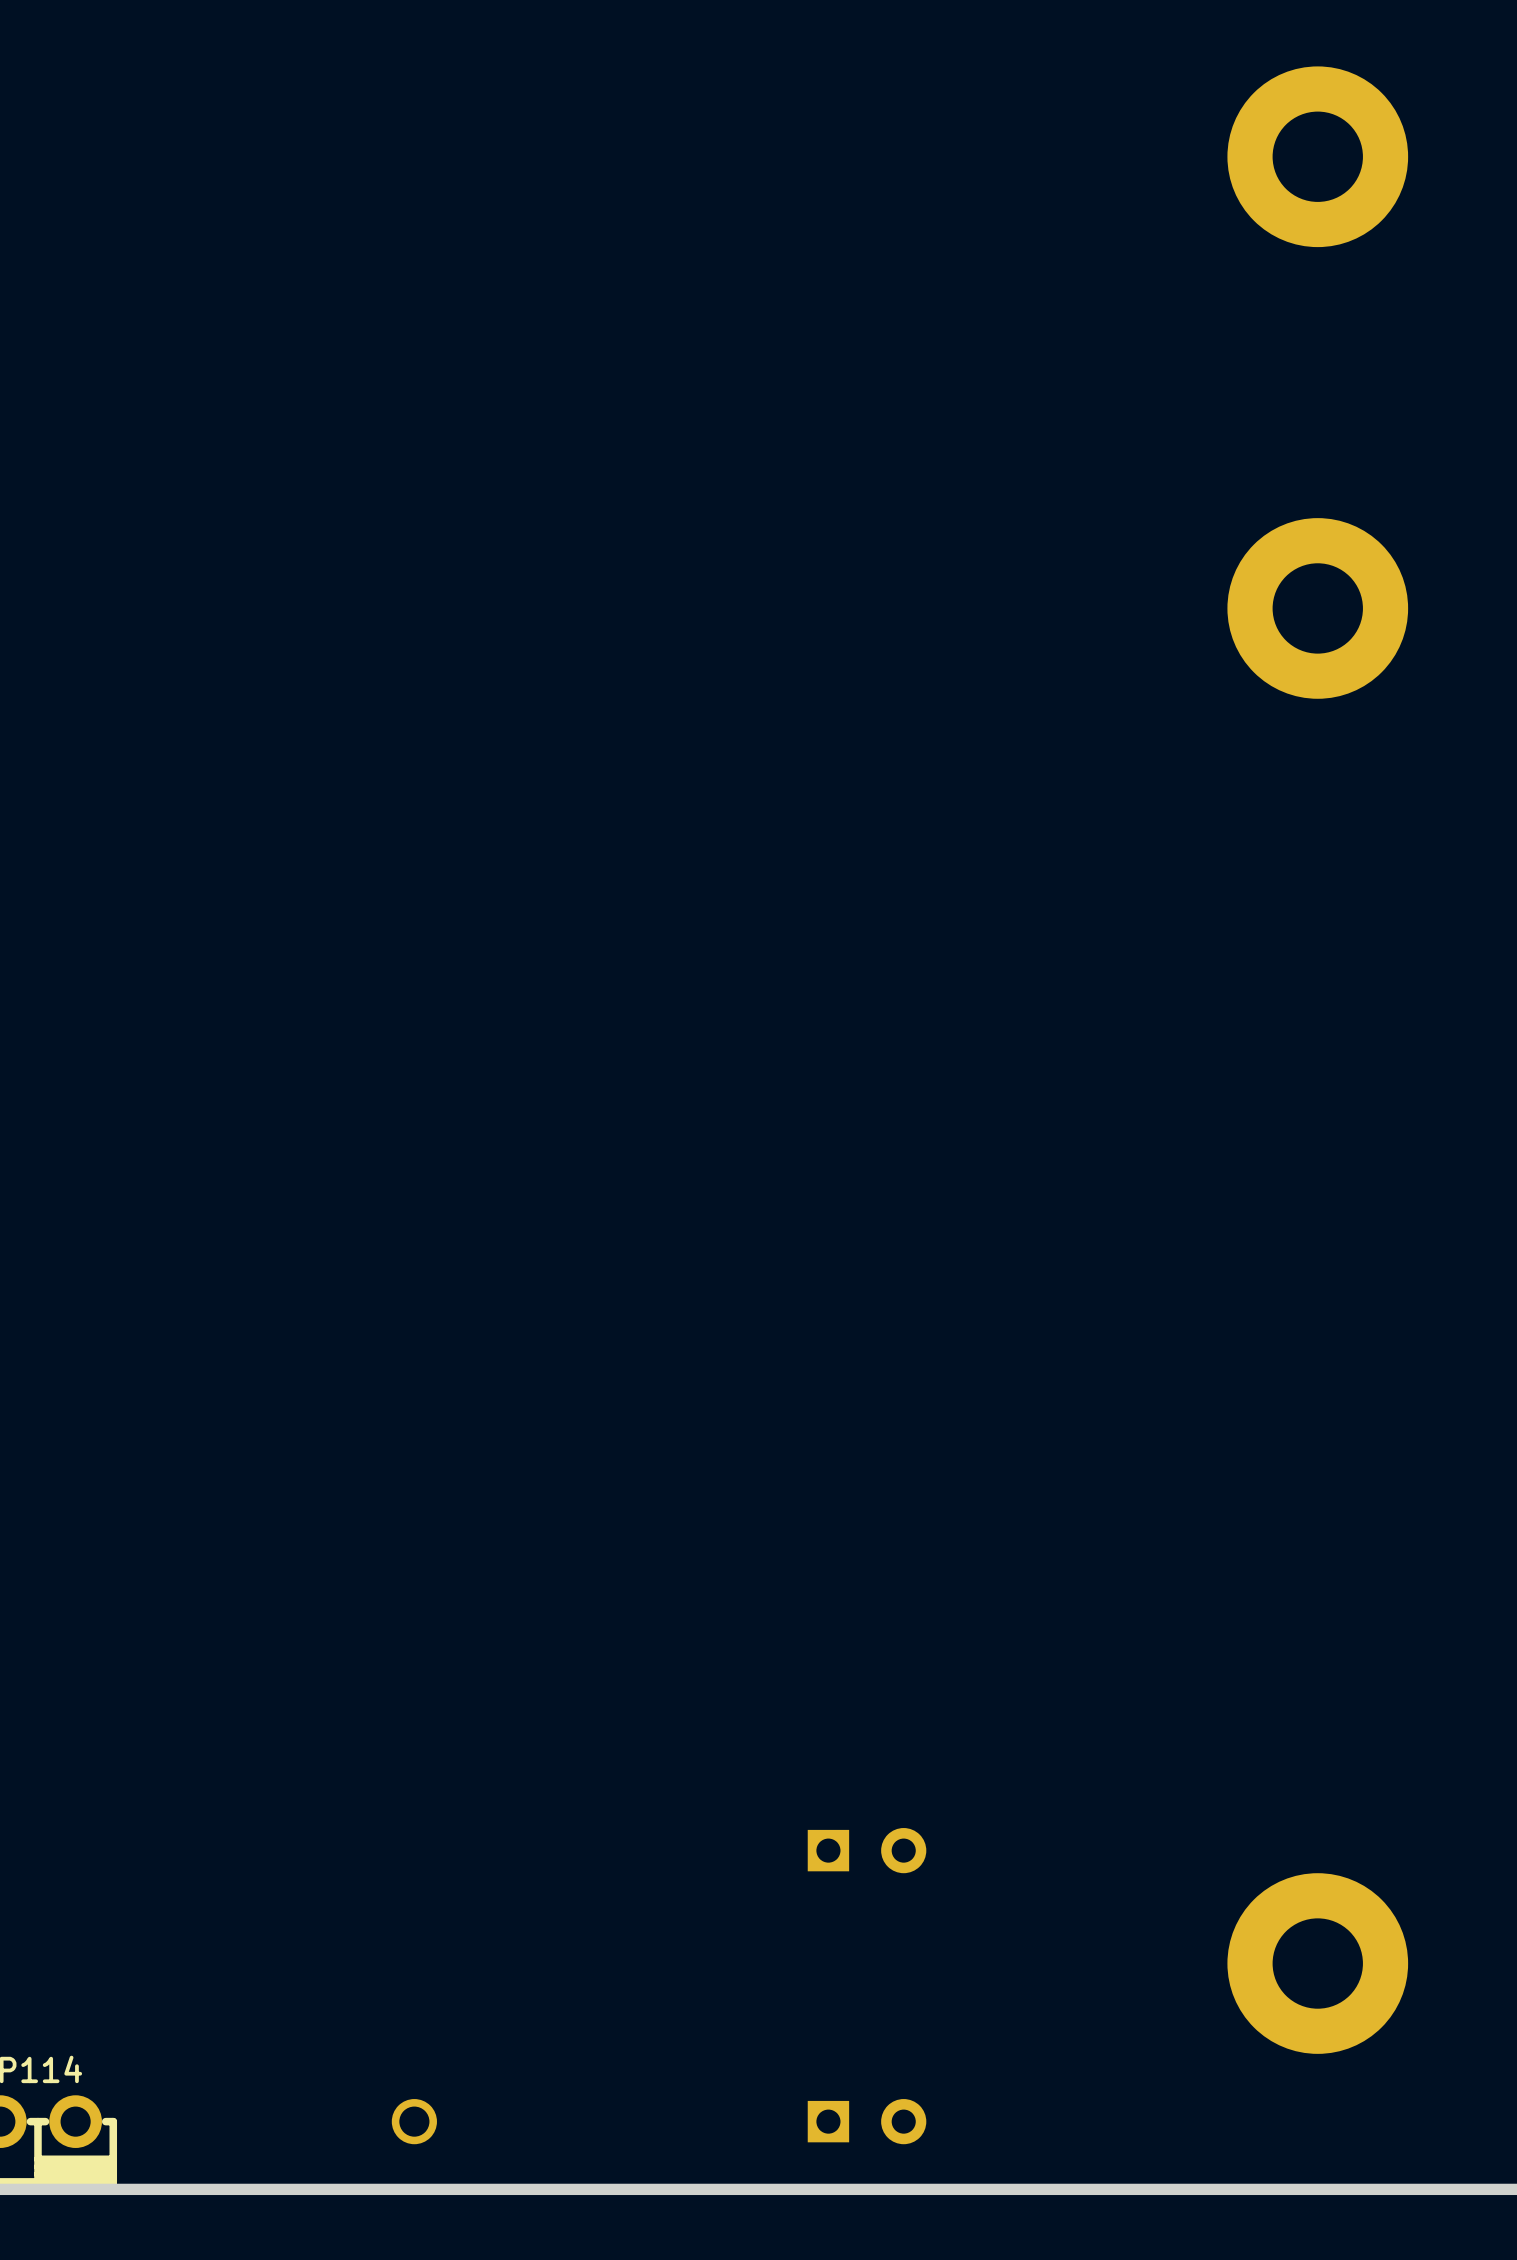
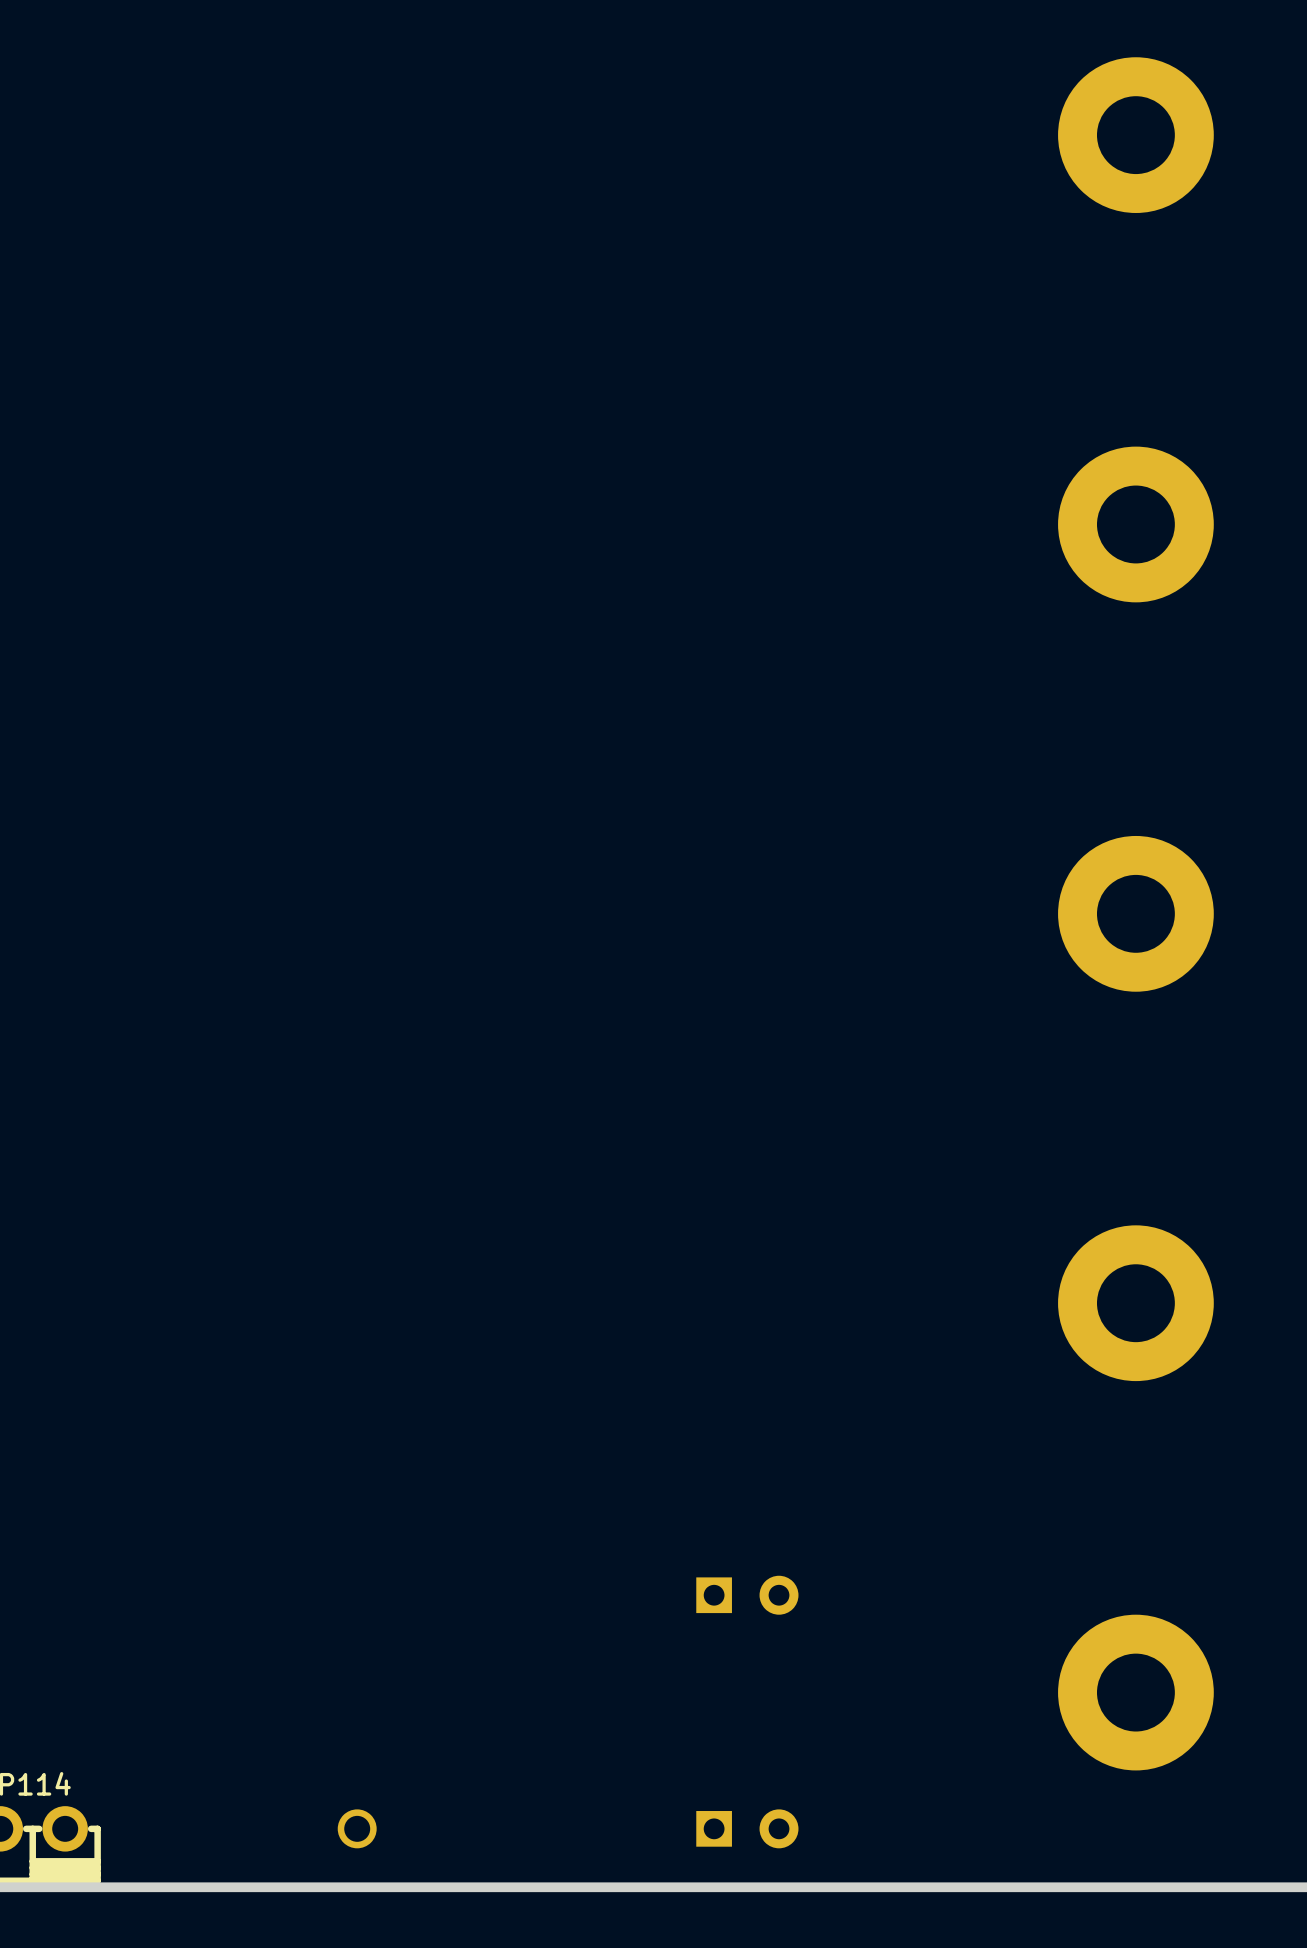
part: none -> (1135, 913)
part: none -> (1135, 1303)

